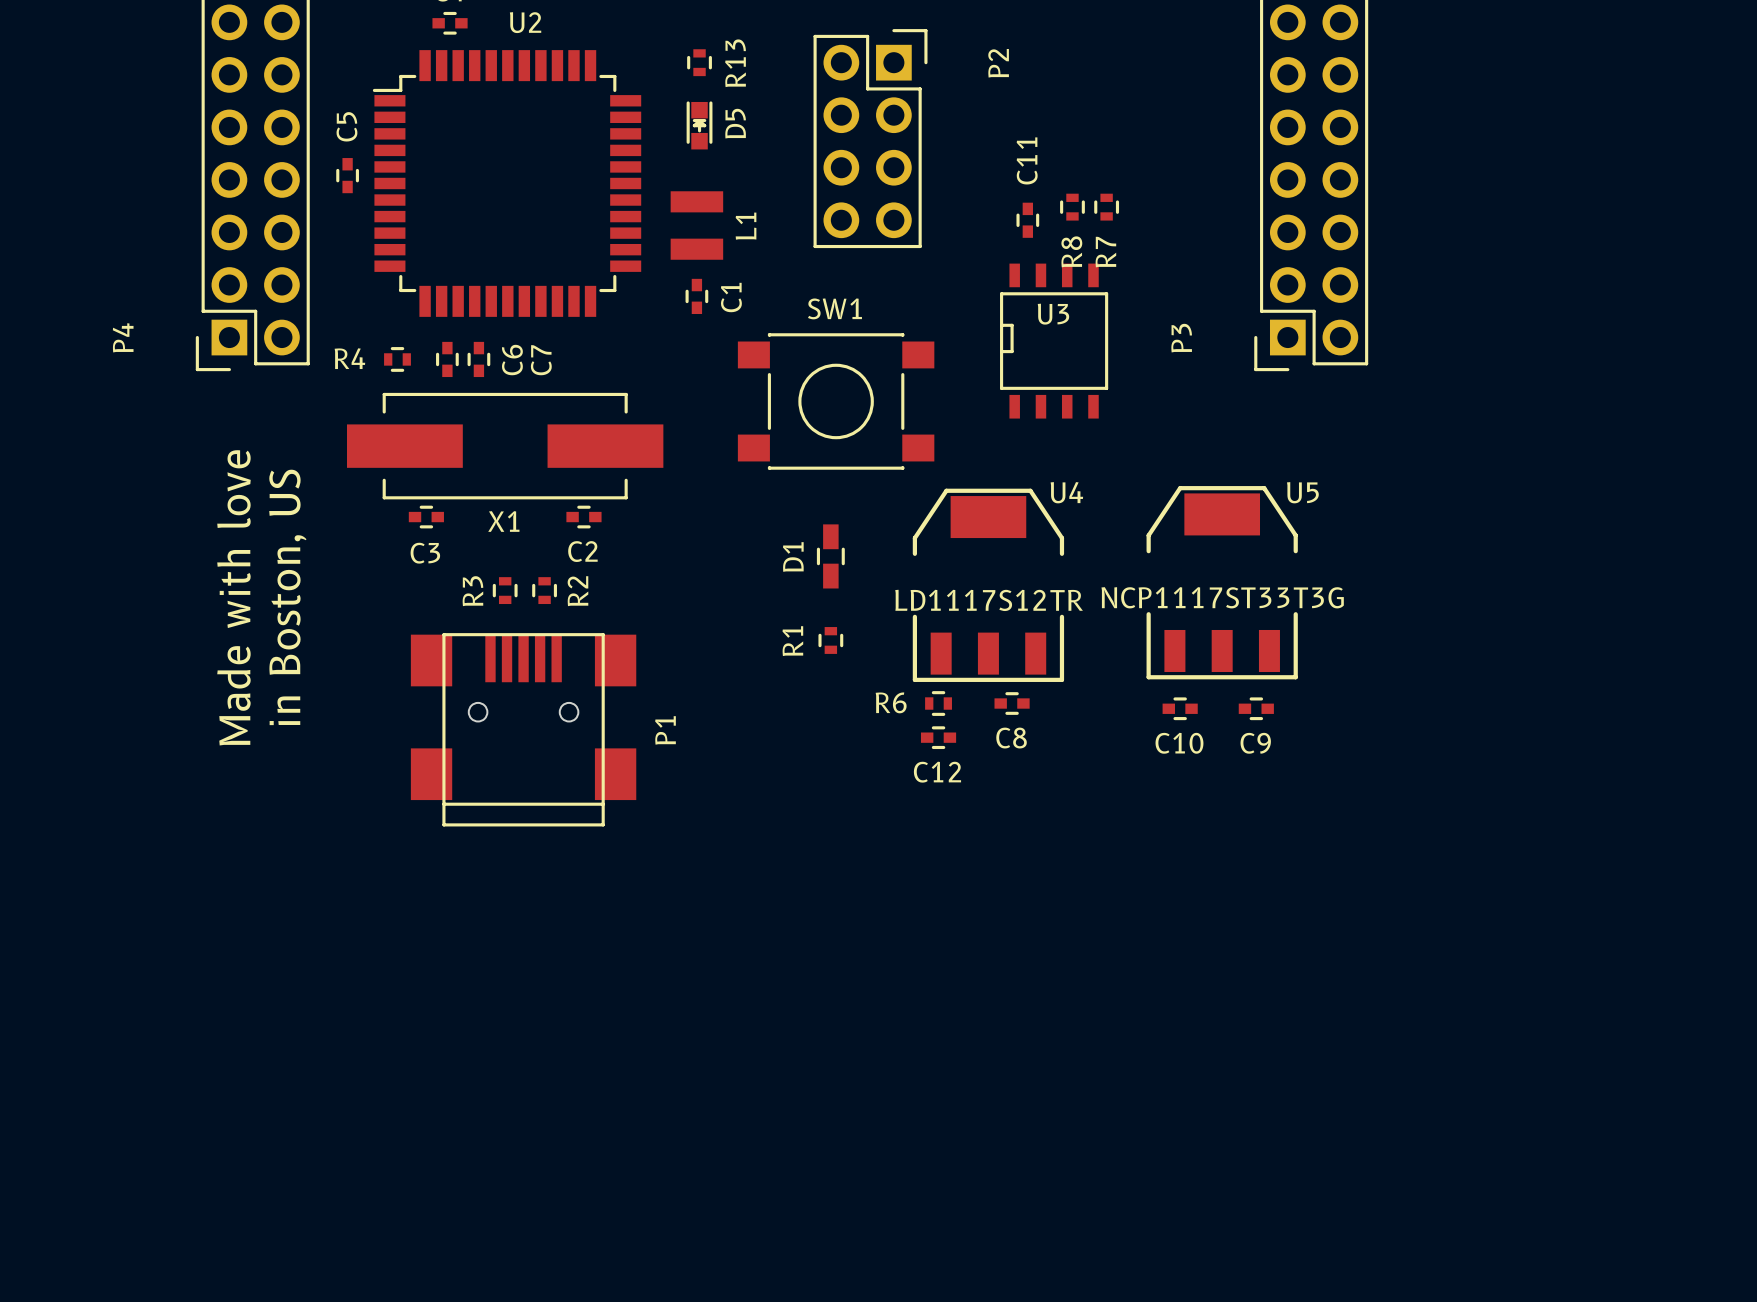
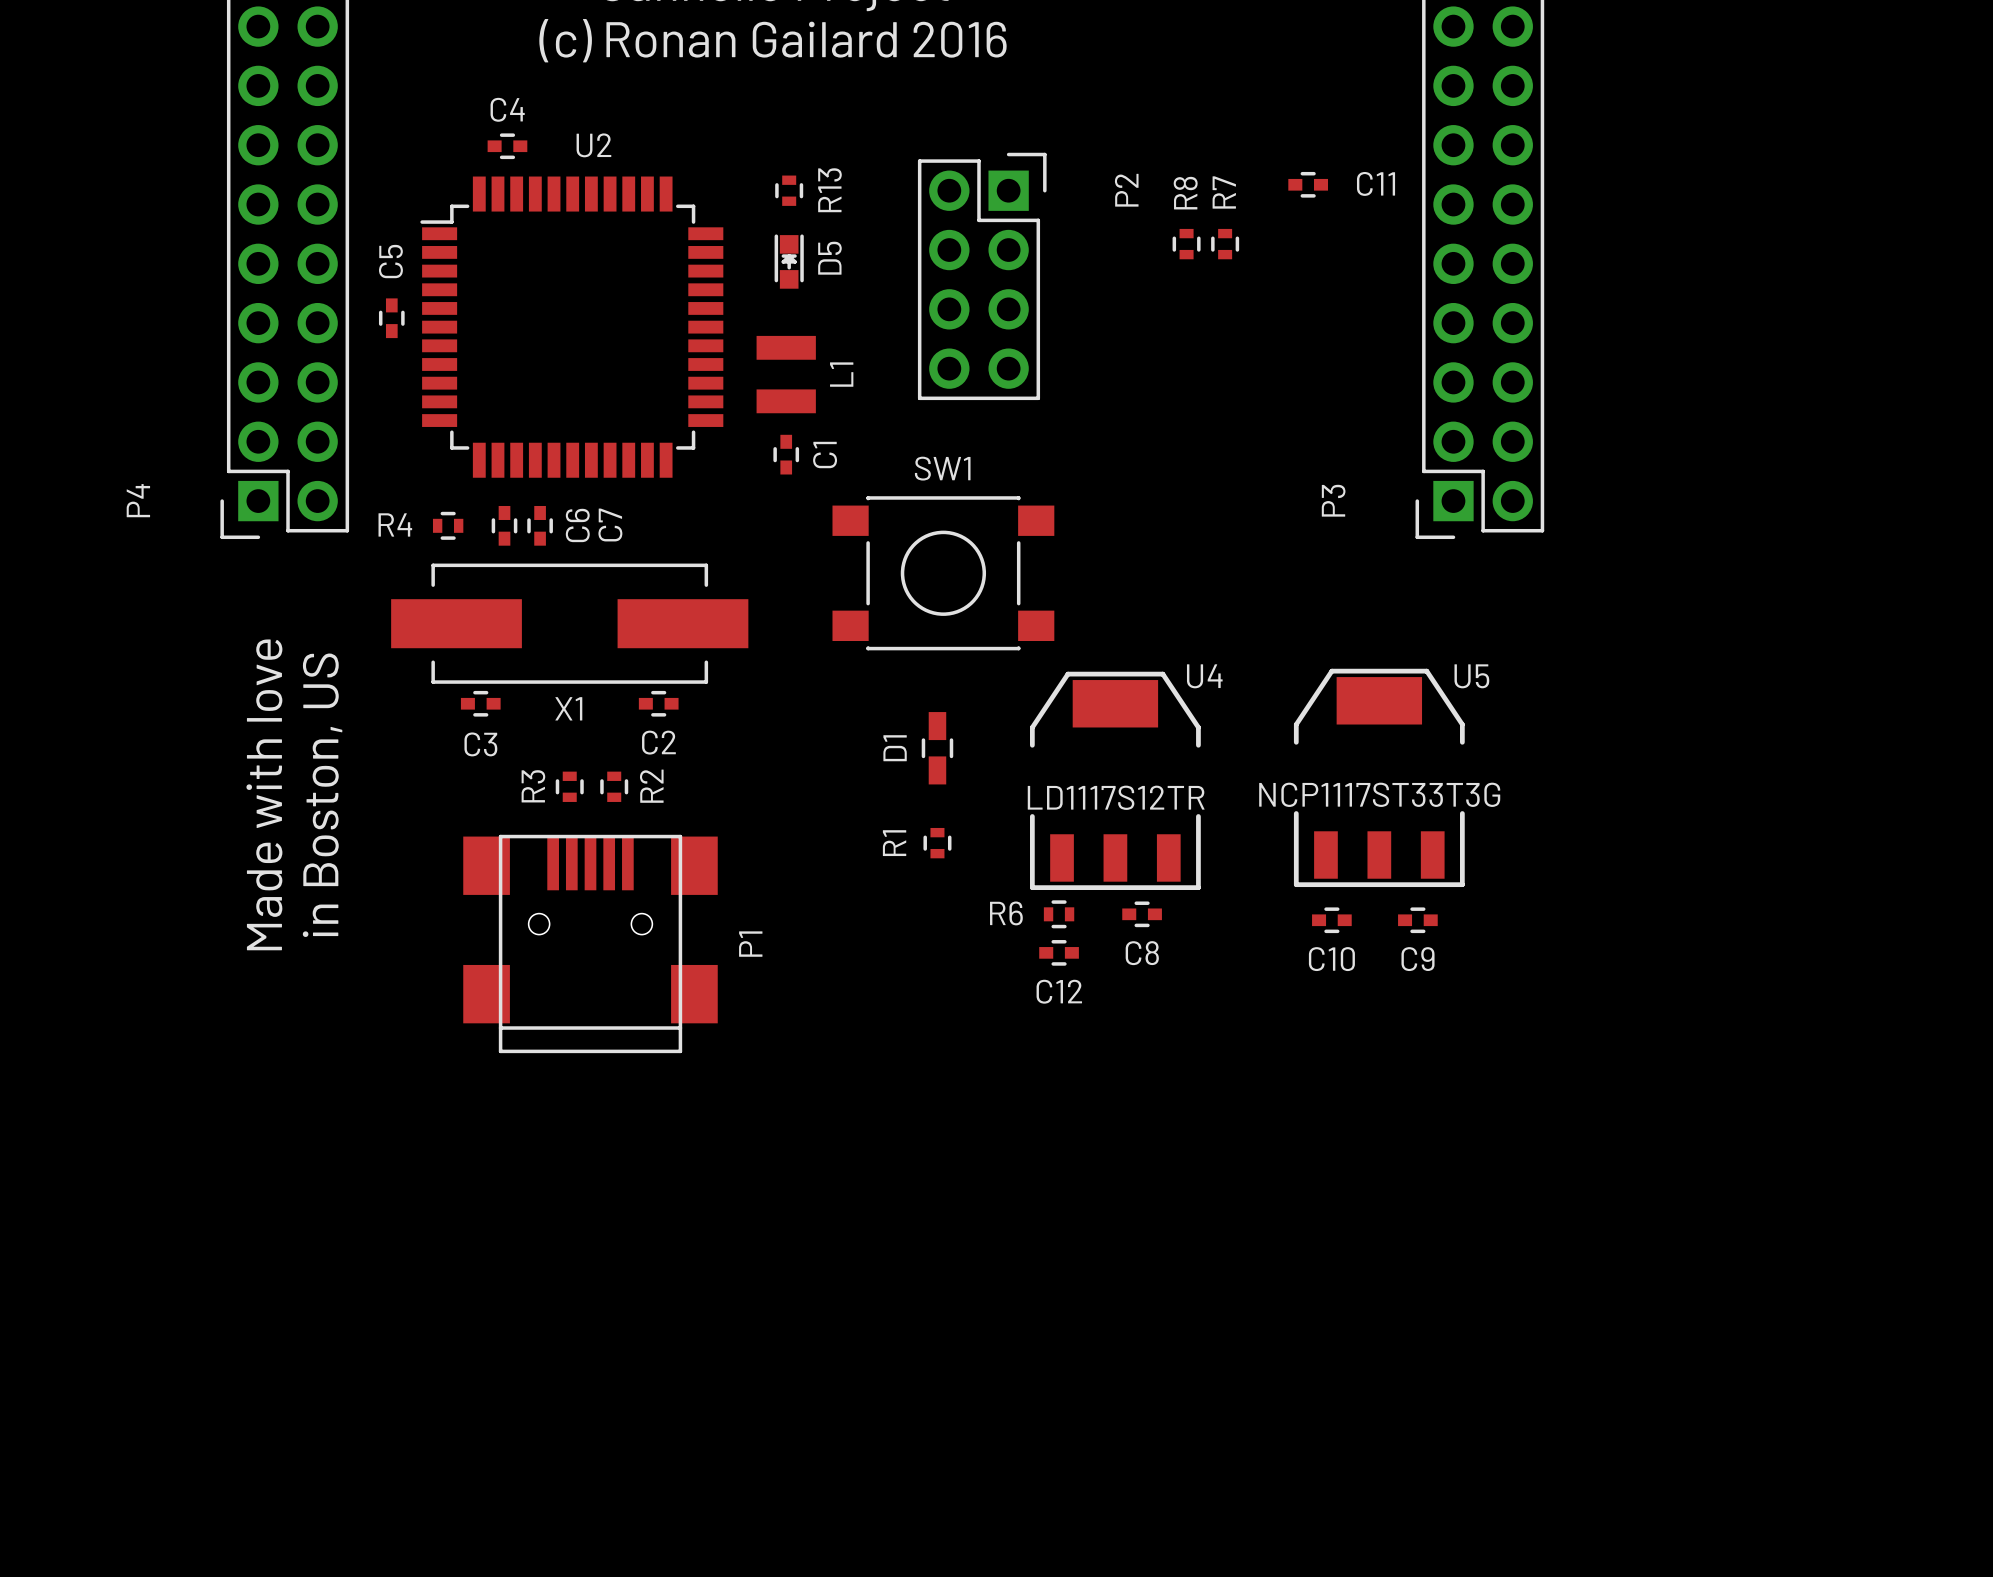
R8 position: (1072, 207) -> (1186, 244)
R7 position: (1106, 207) -> (1225, 244)
C11 rotation: 0° (1027, 220) -> 90° clockwise (1308, 184)
C11 position: (1027, 220) -> (1308, 184)
R8 name position: R8 (1071, 251) -> R8 (1185, 193)
R7 name position: R7 (1105, 252) -> R7 (1224, 192)
U3: (1054, 341) -> none

